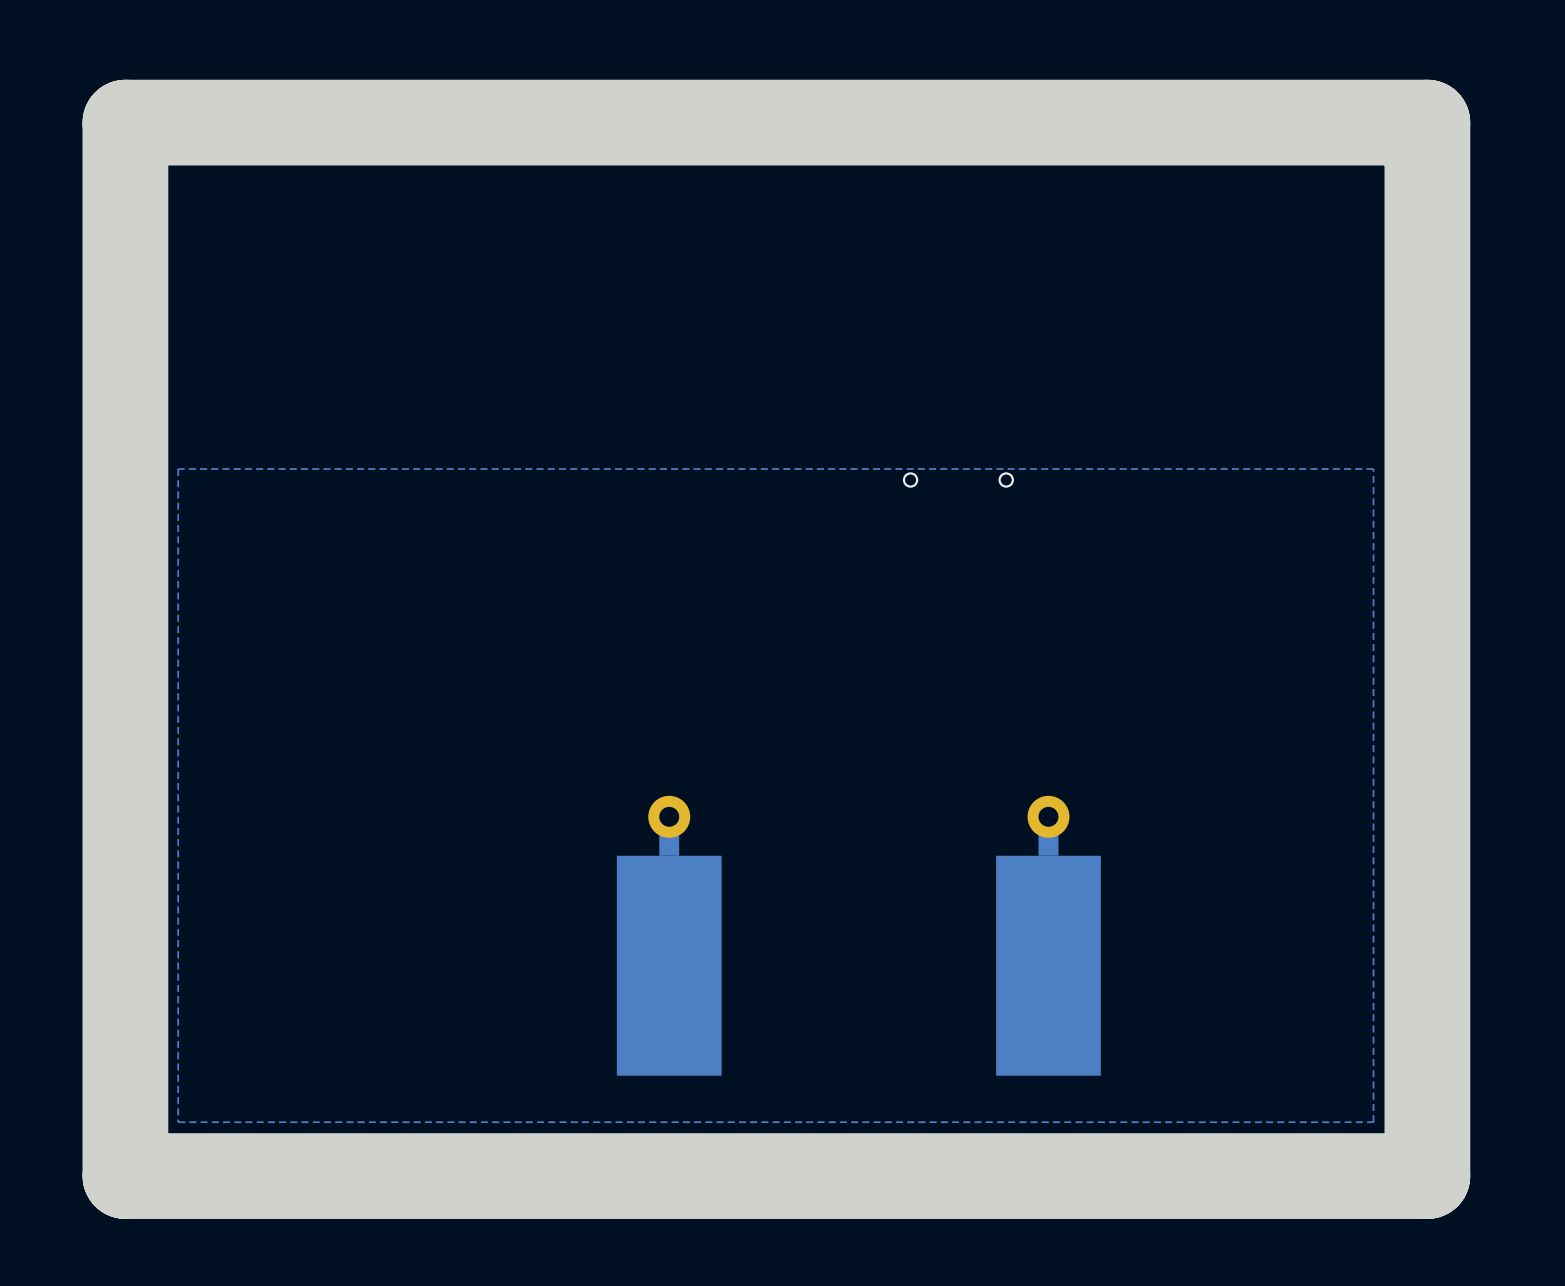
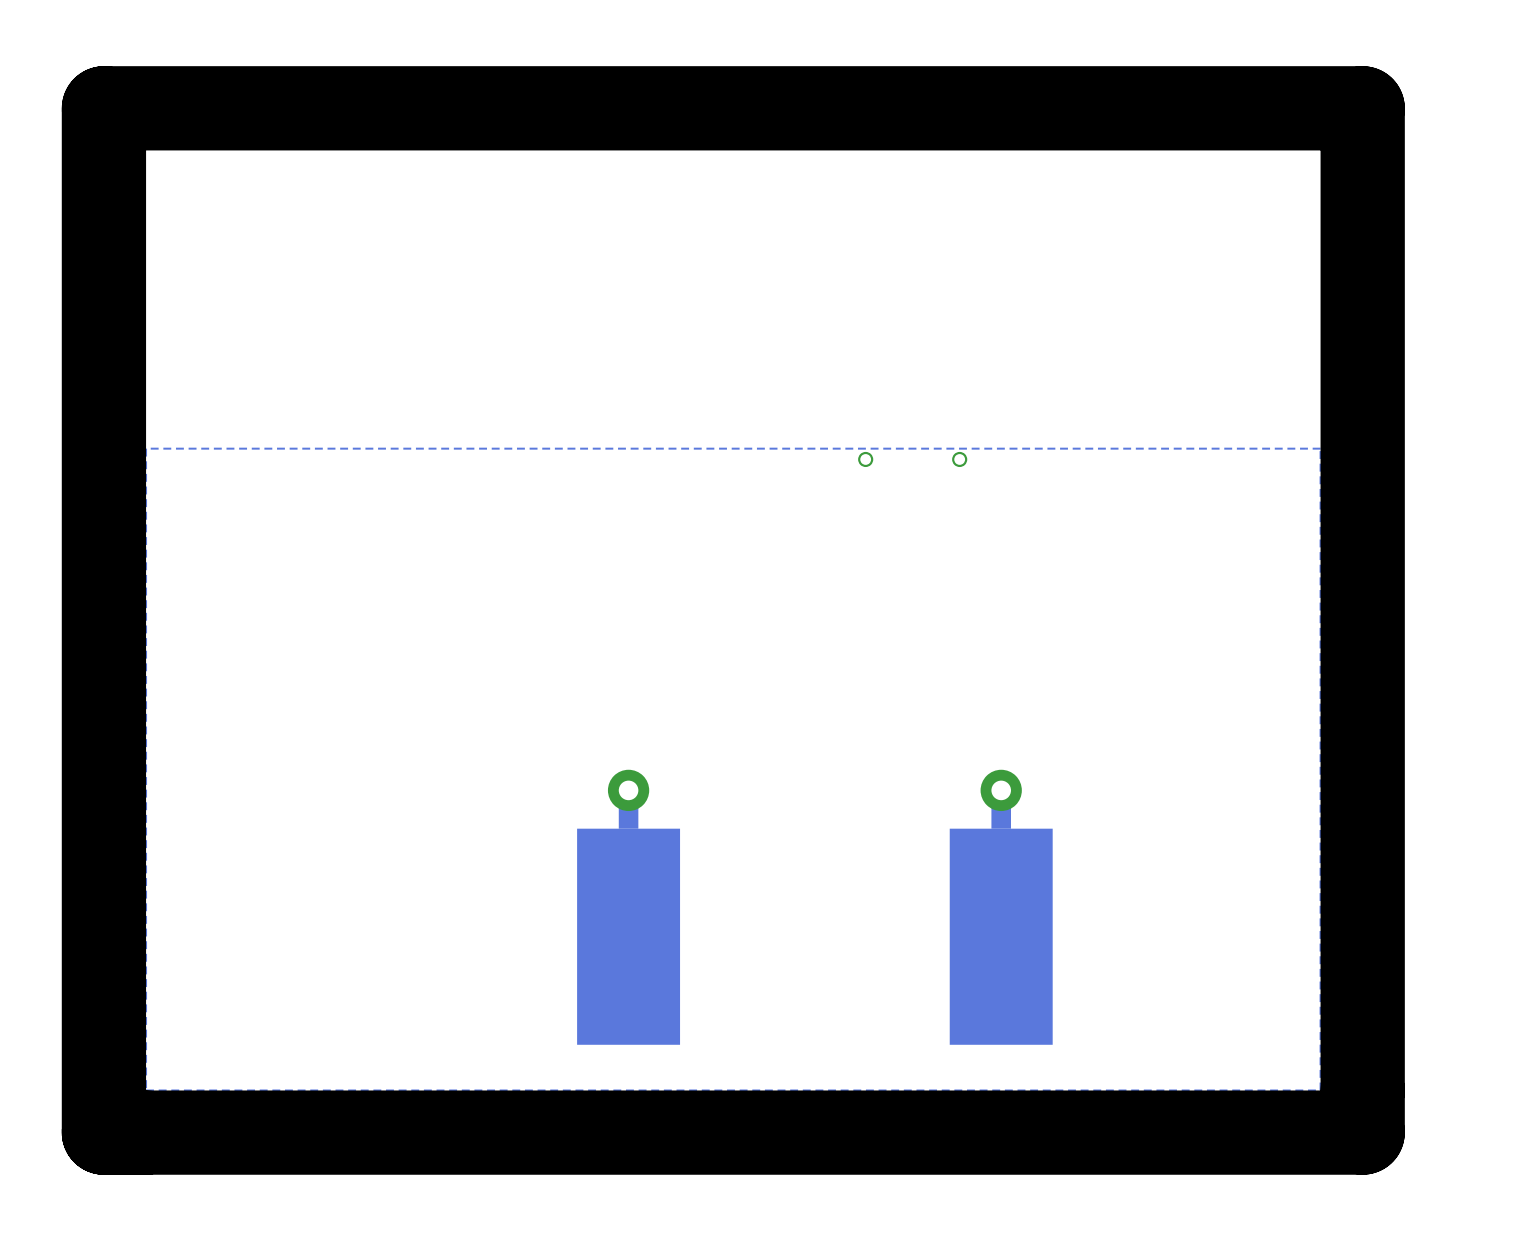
board edge: (1416, 122) (1427, 122) (1427, 1176) (125, 1176) (125, 122) (135, 122) -> (1362, 108) (1362, 1132) (103, 1132) (103, 108)

